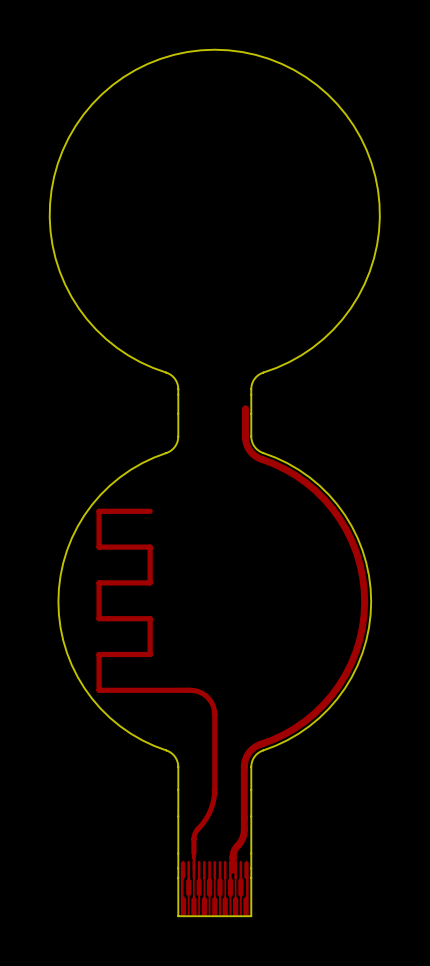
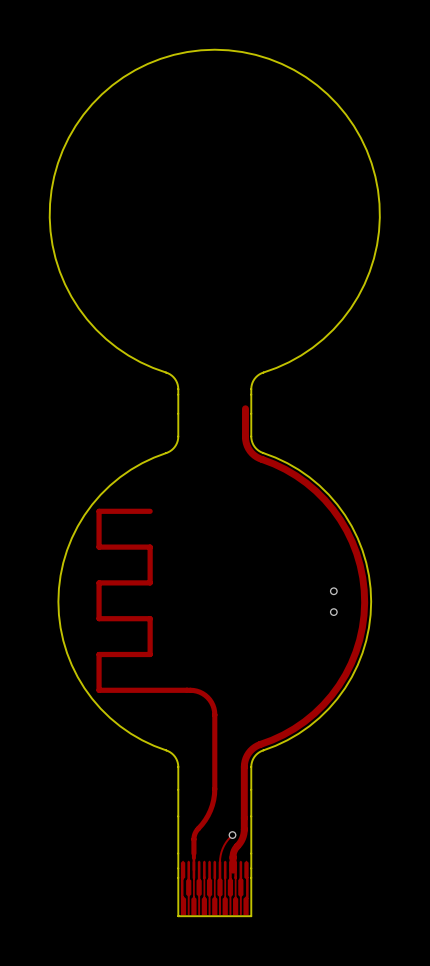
via: none -> (333, 591)
via: none -> (333, 612)
track: none -> (232, 835) (221, 851) (219, 872)
via: none -> (232, 835)

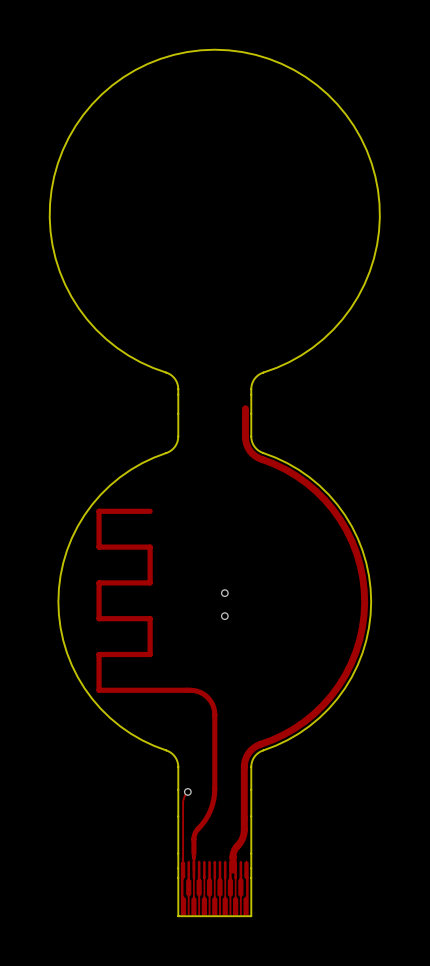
via: (333, 591) -> none
via: none -> (224, 593)
via: (333, 612) -> none
via: none -> (224, 616)
track: none -> (187, 791) (183, 801) (183, 870)
track: (232, 835) (221, 851) (219, 872) -> none
via position: (232, 835) -> (187, 791)

